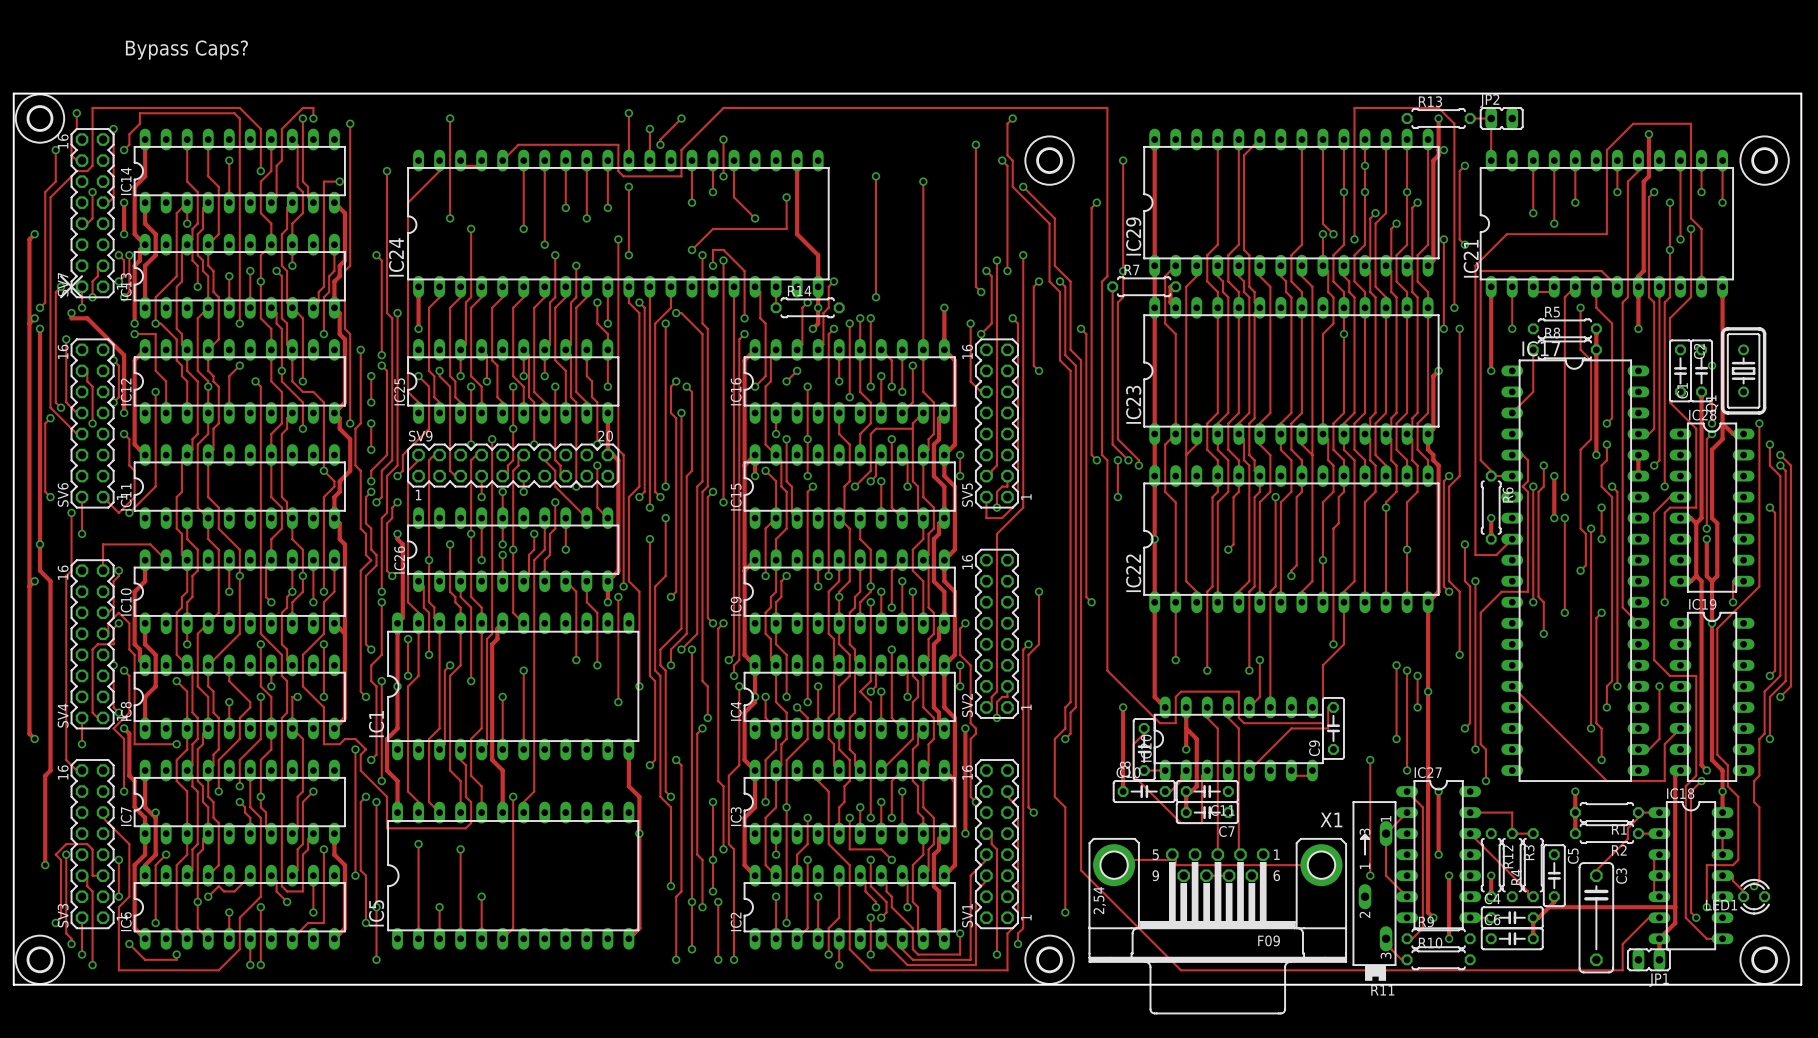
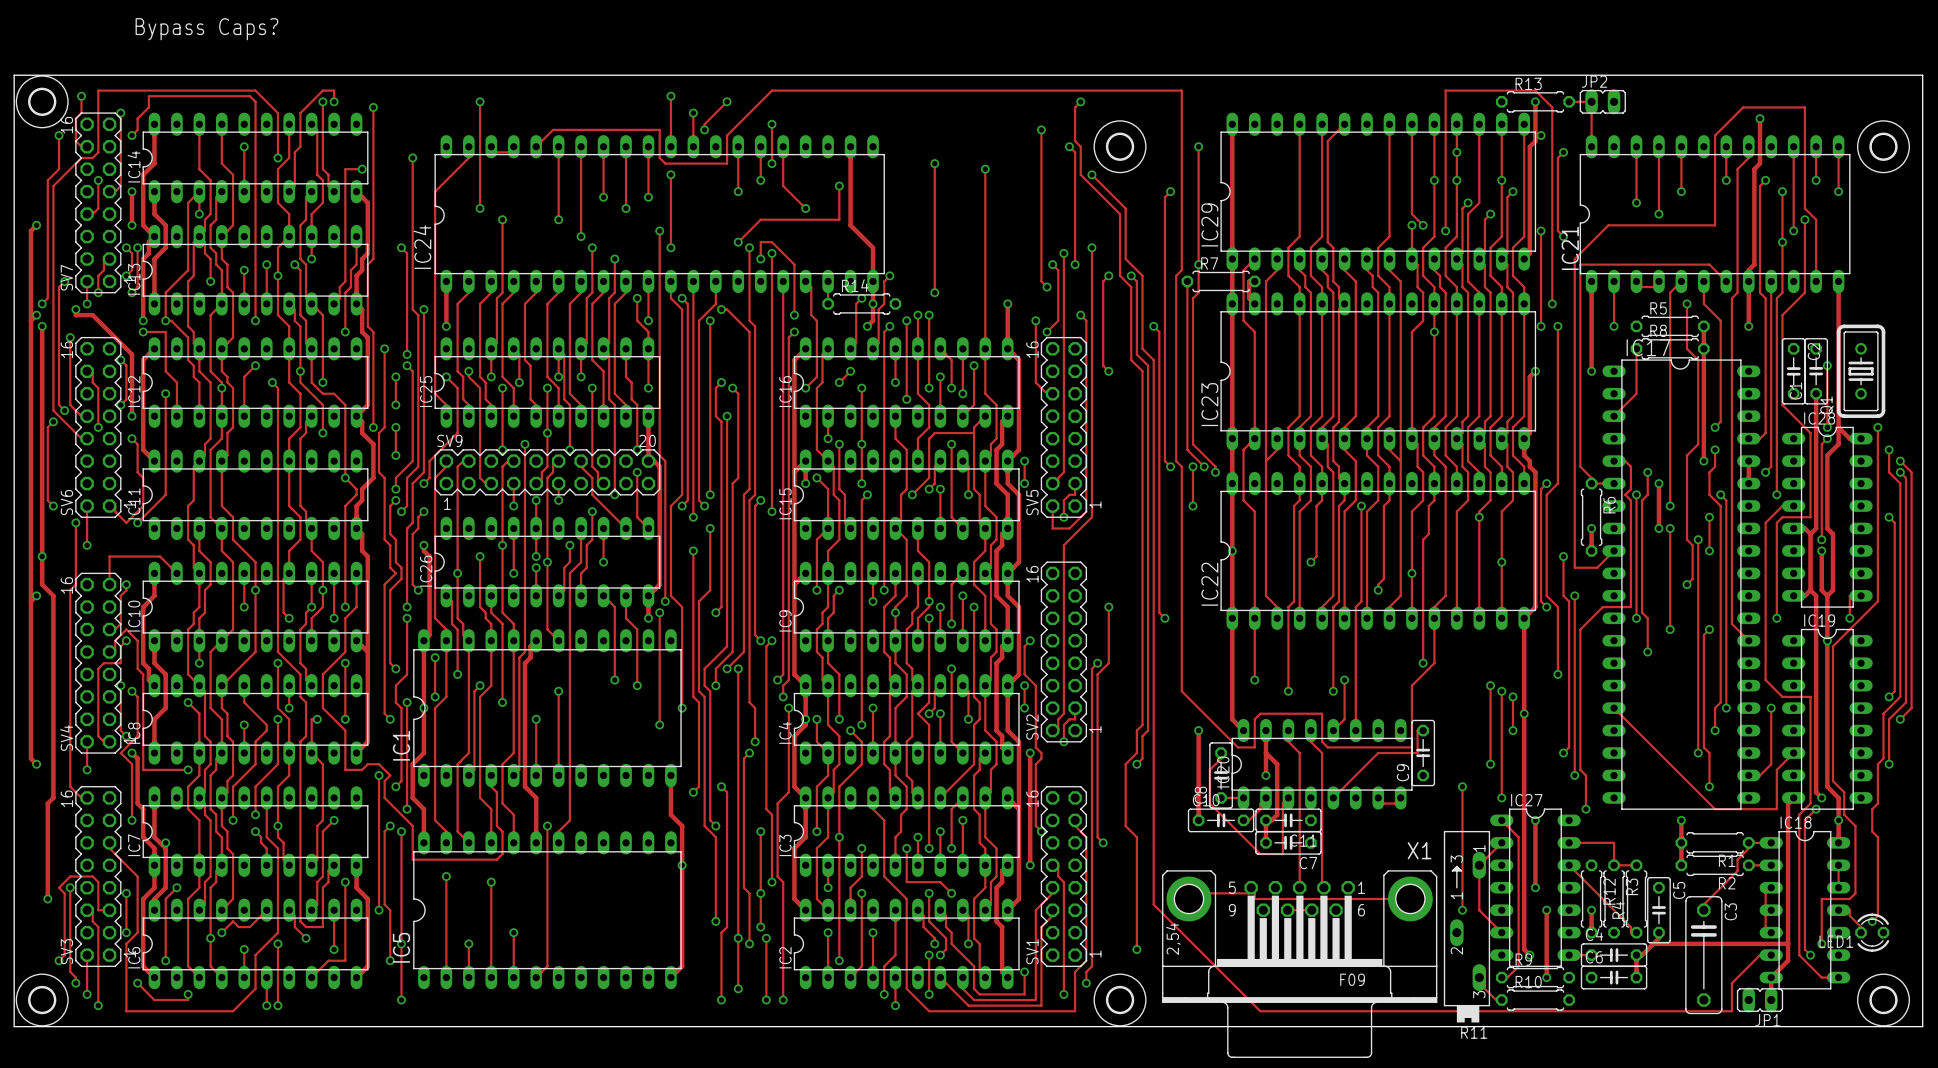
line: (61, 276) (82, 297) -> none
line: (82, 276) (61, 297) -> none

